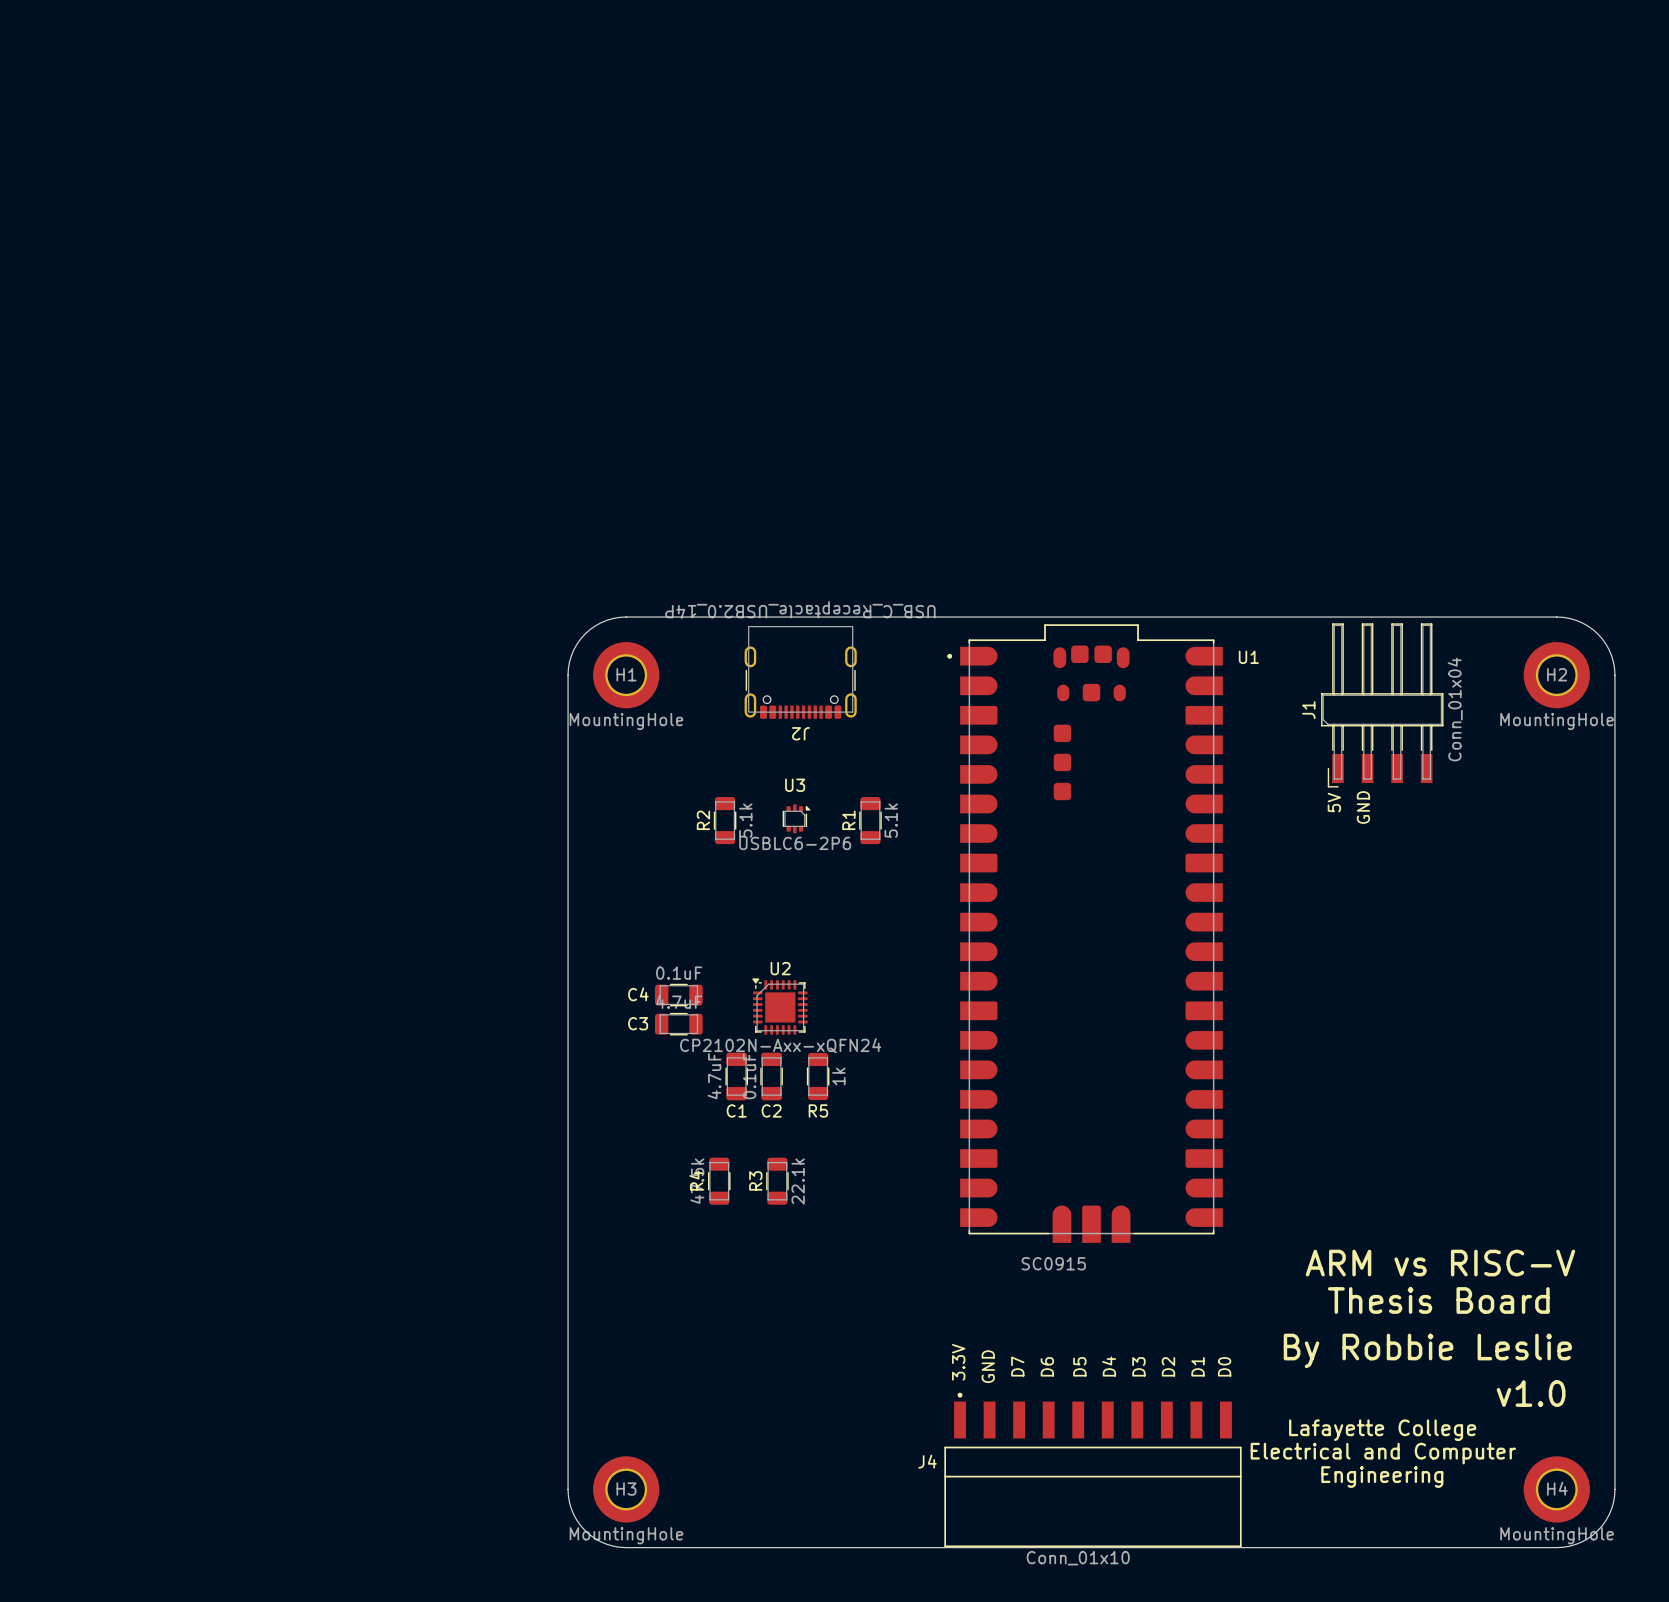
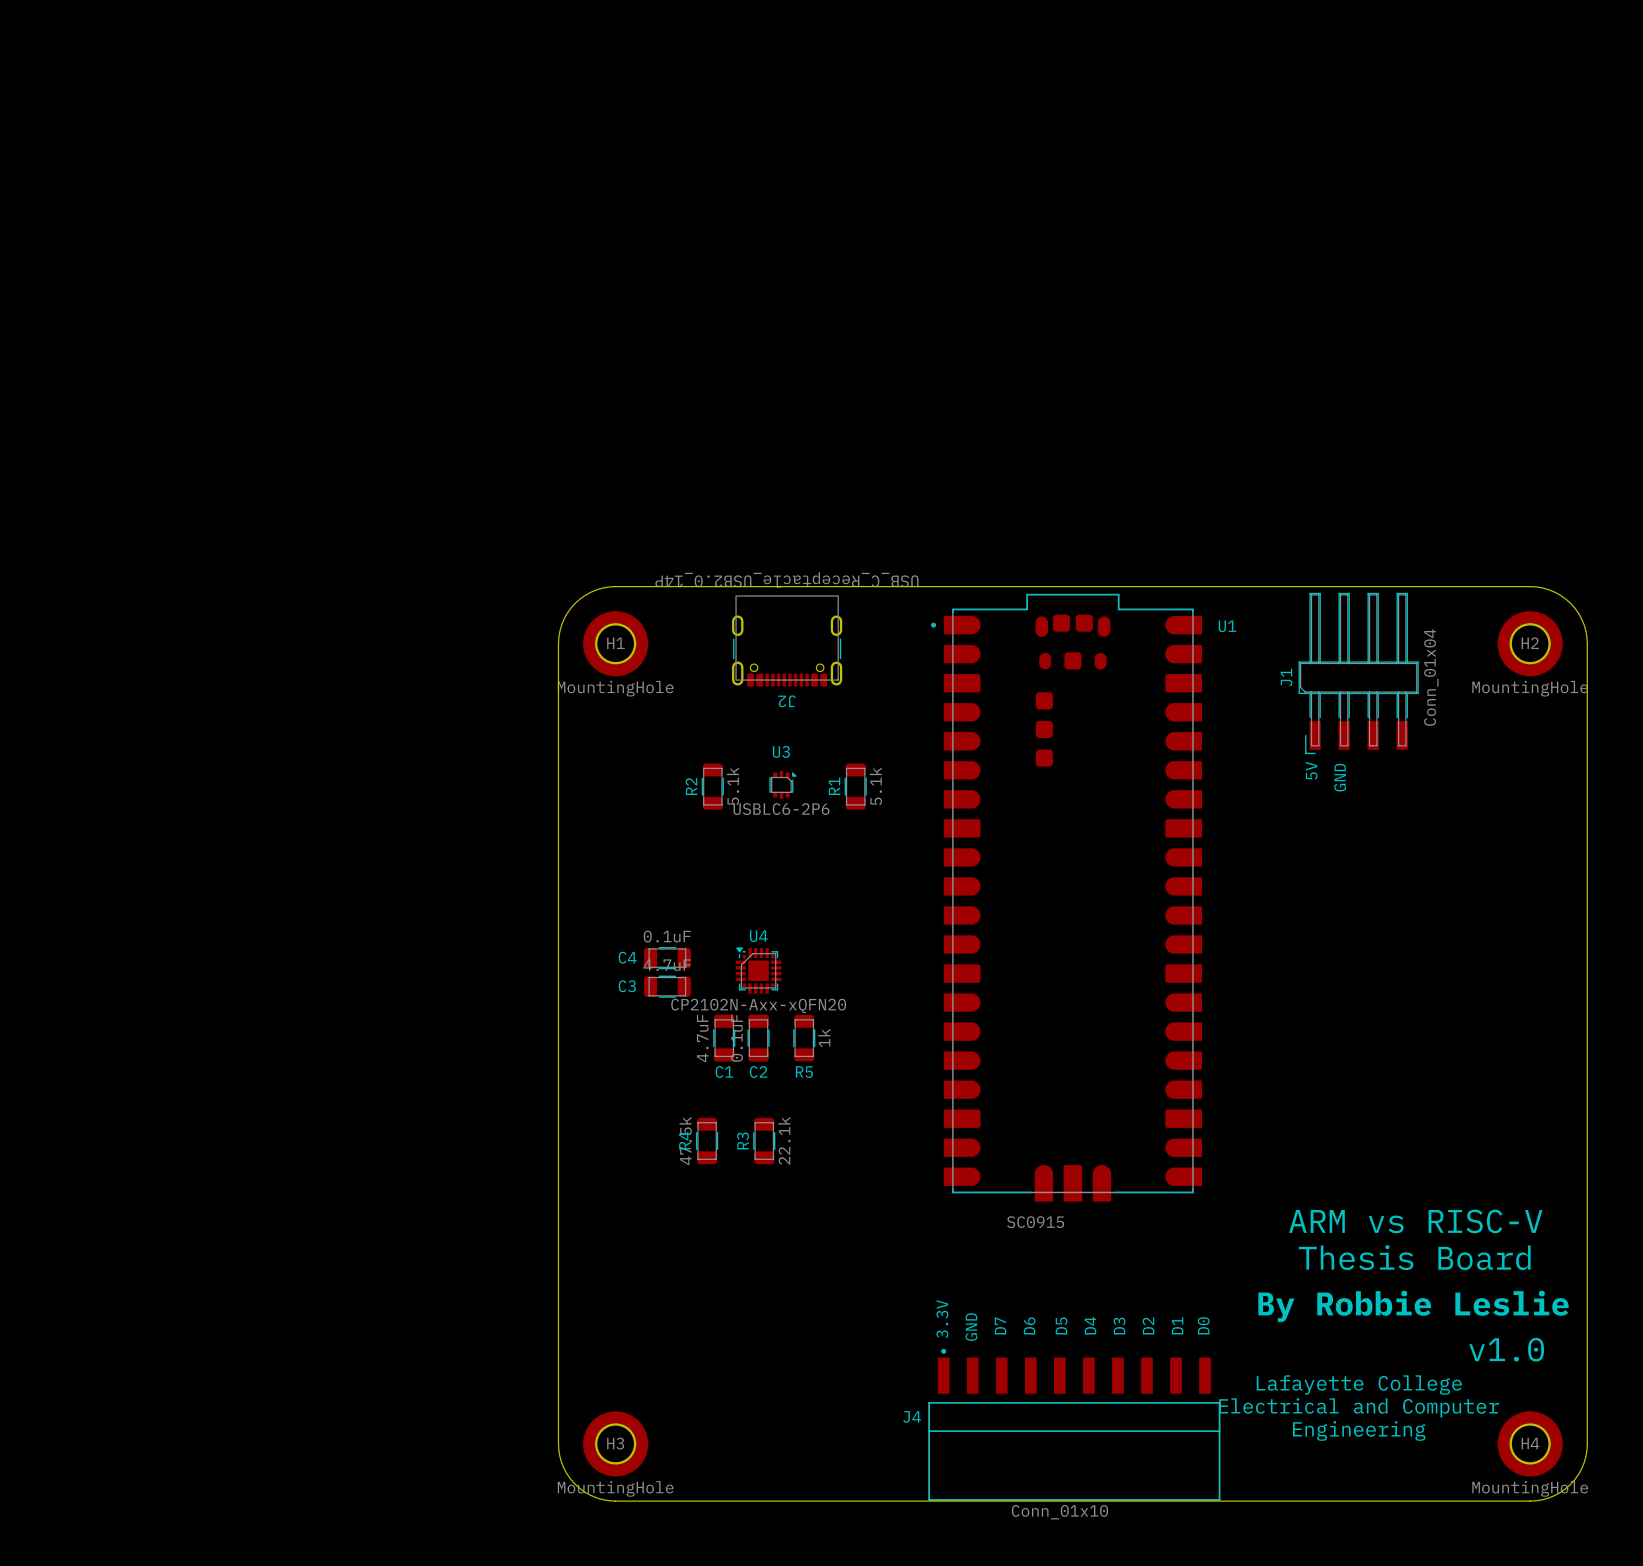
U2: CP2102N-Axx-xQFN24 (779, 1006) -> none
U4: none -> CP2102N-Axx-xQFN20 (758, 970)

